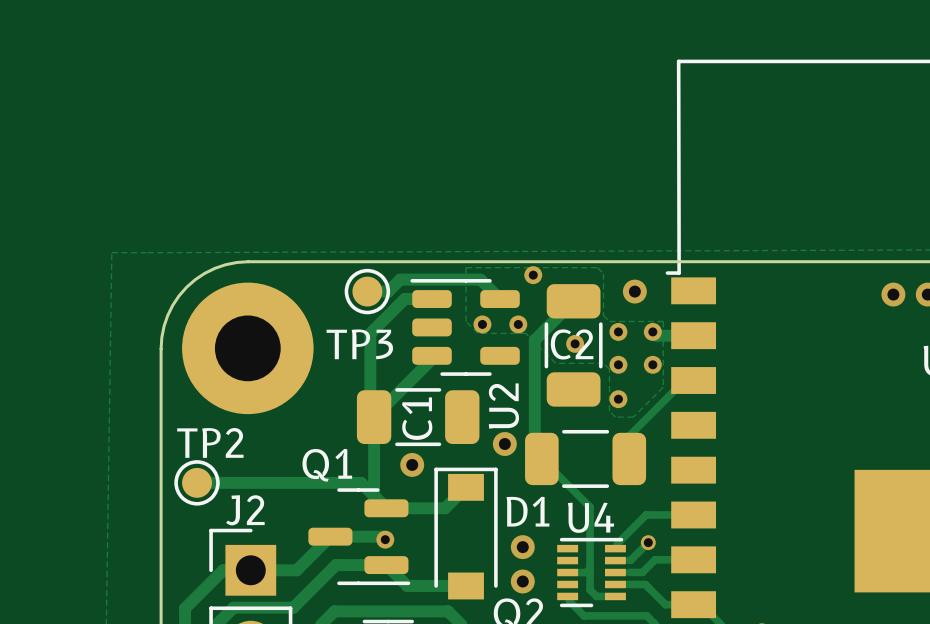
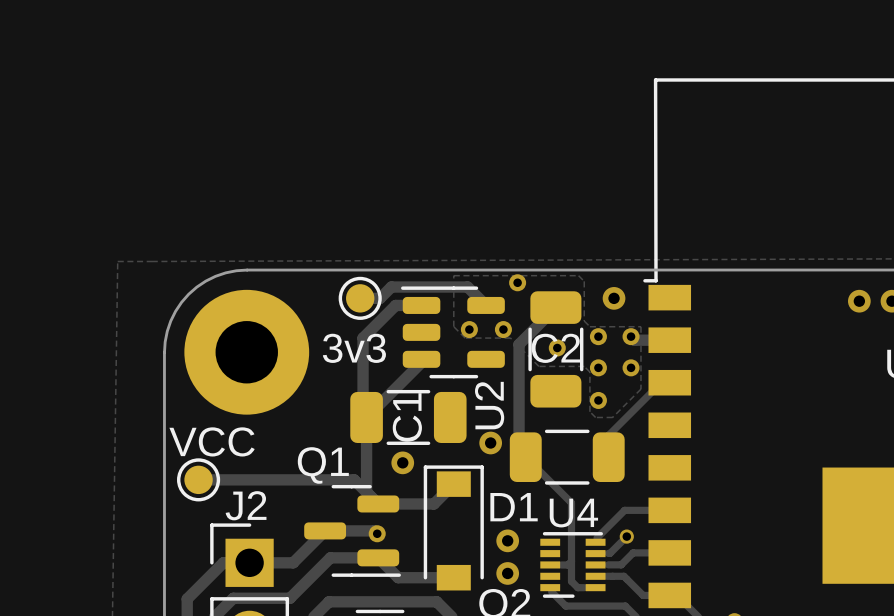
TP3 name: TP3 (359, 344) -> 3v3 (354, 348)
TP2 name: TP2 (210, 442) -> VCC (212, 441)

